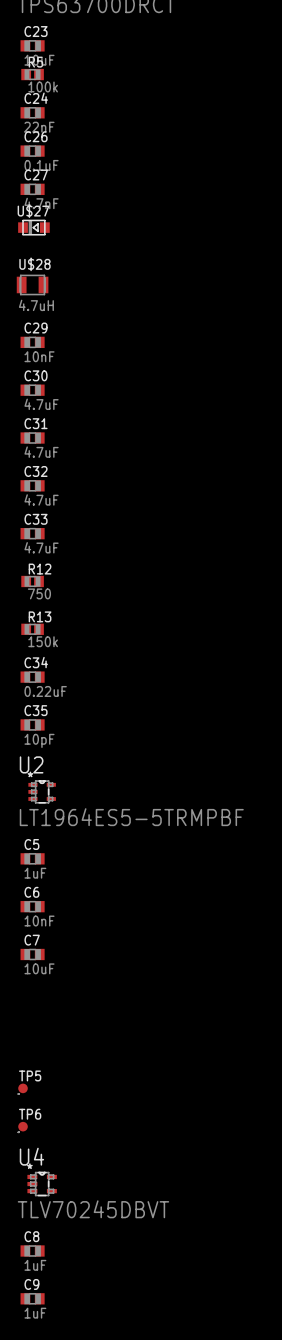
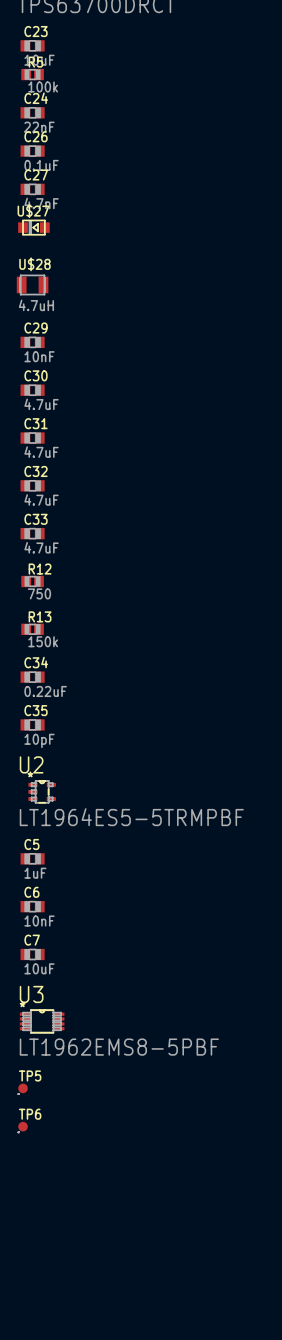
U3: none -> LT1962EMS8-5PBF (42, 1021)
U4: TLV70245DBVT (42, 1184) -> none
C8: 1uF (32, 1250) -> none
C9: 1uF (32, 1298) -> none

